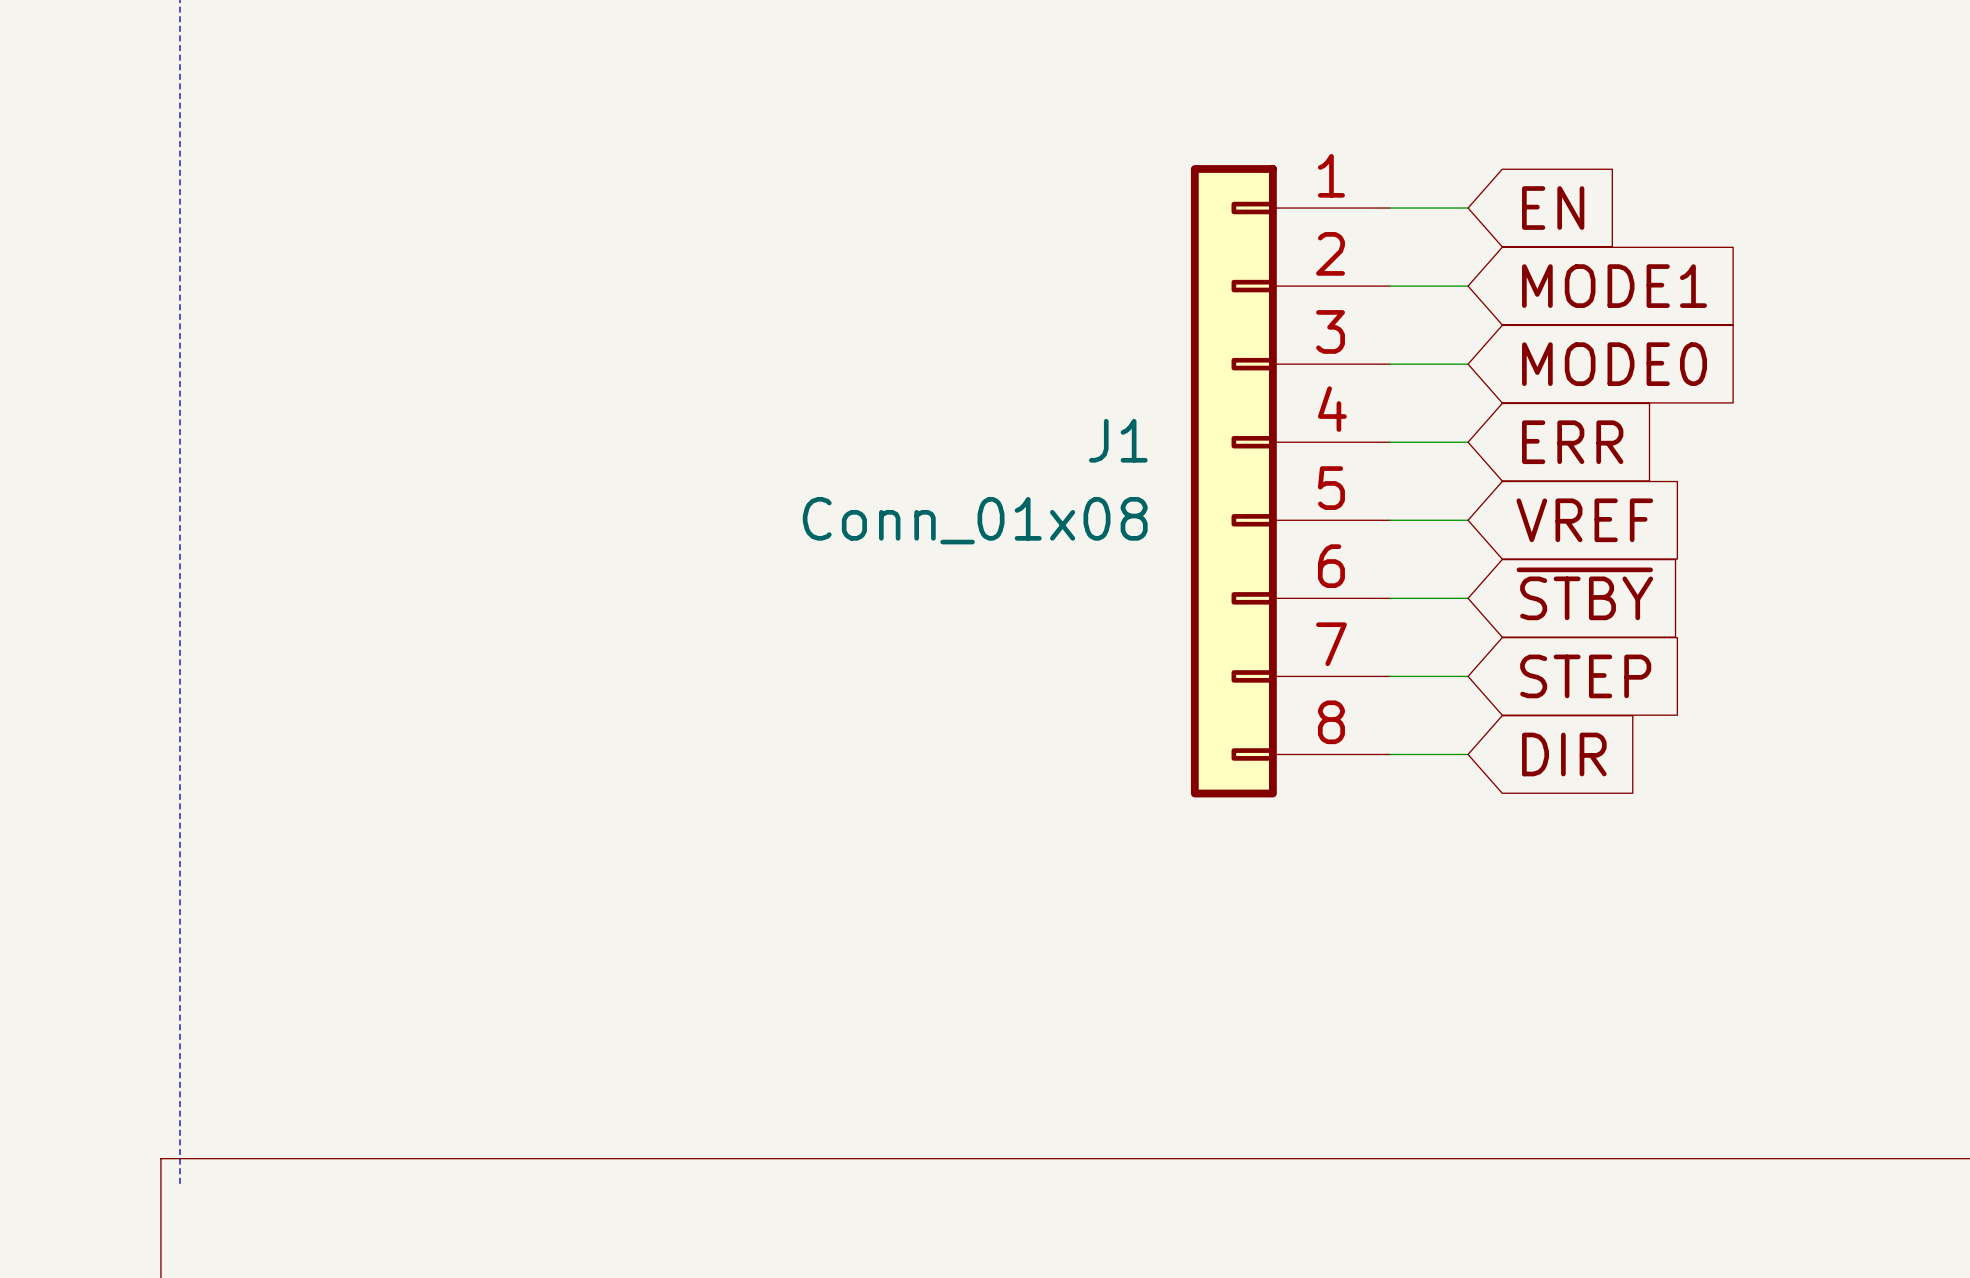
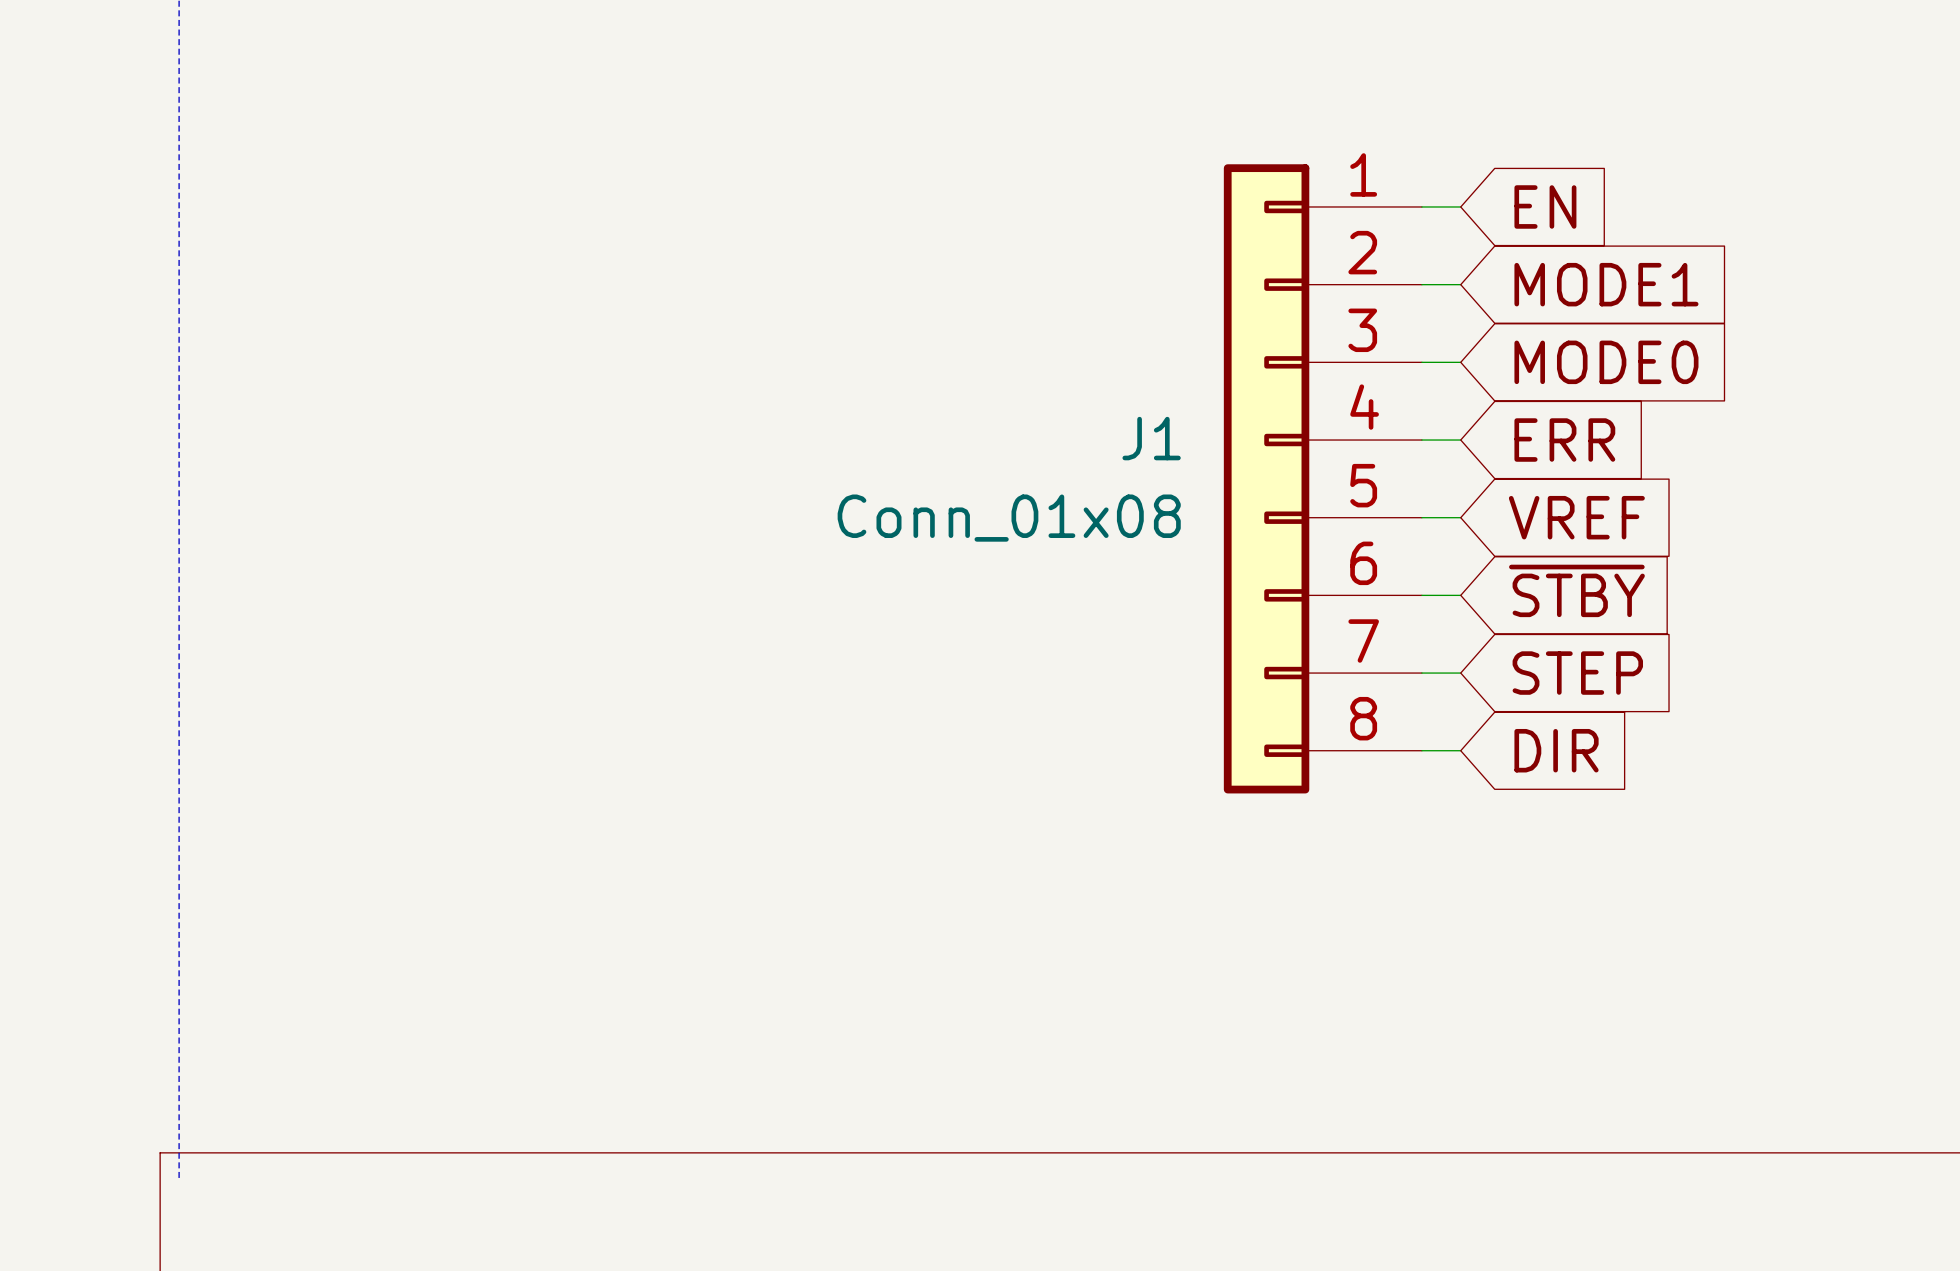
J1 position: (1290, 481) -> (1322, 478)

